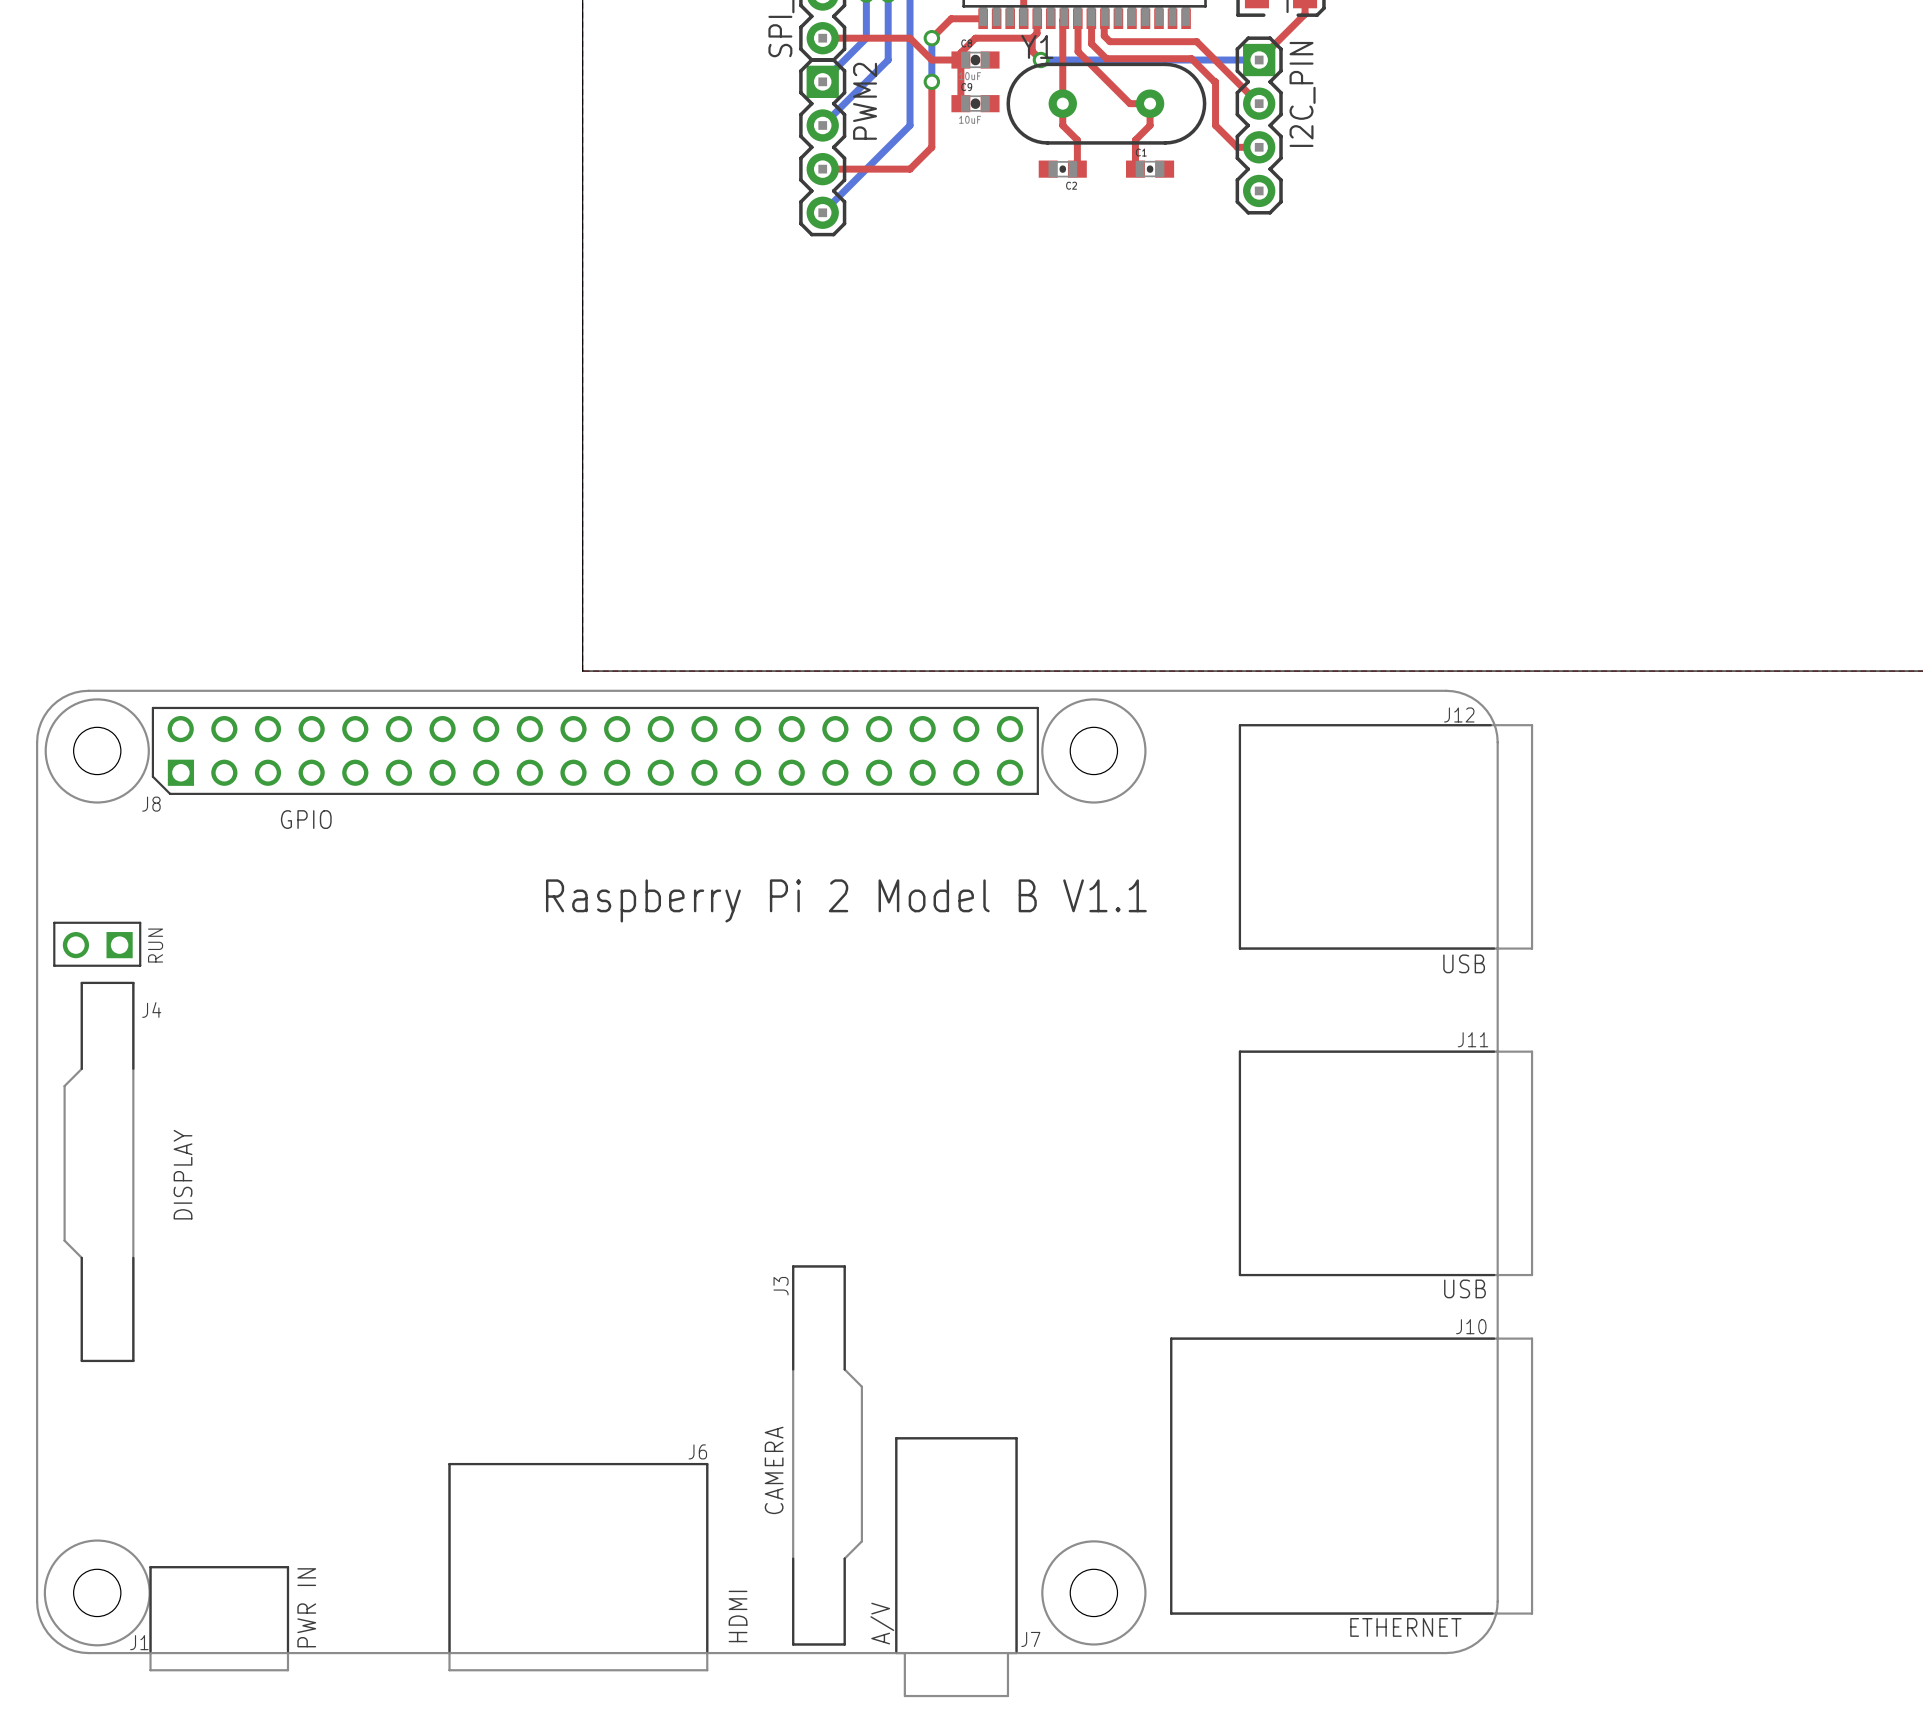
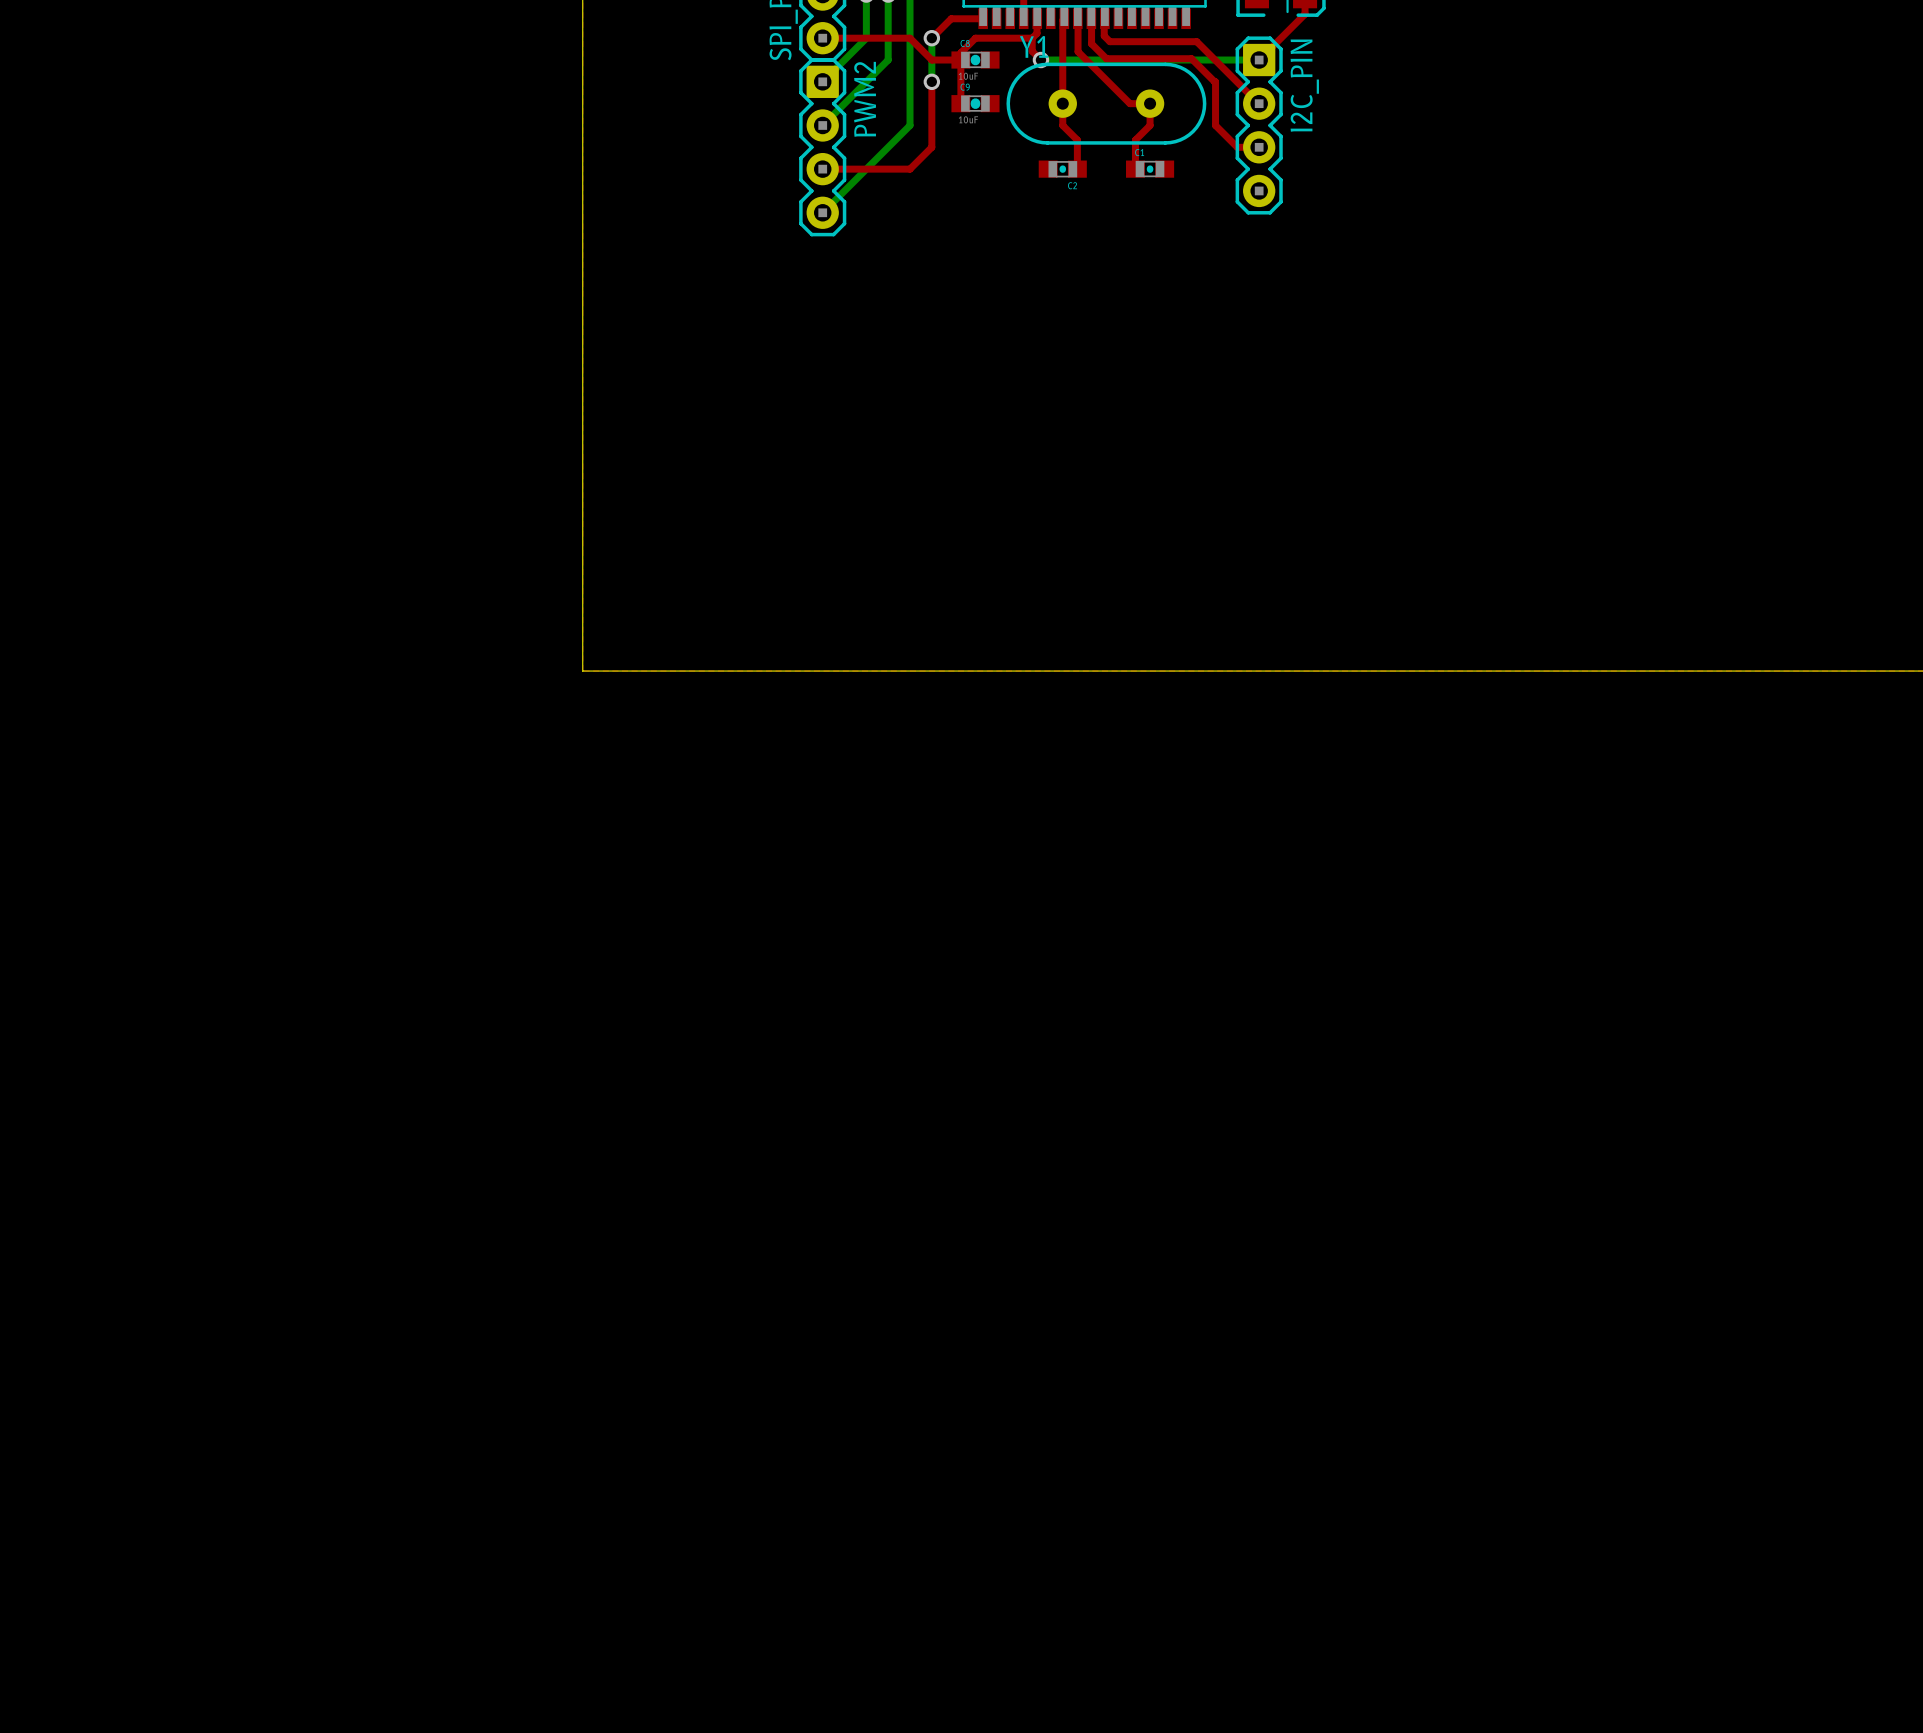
part: (784, 1193) -> none

